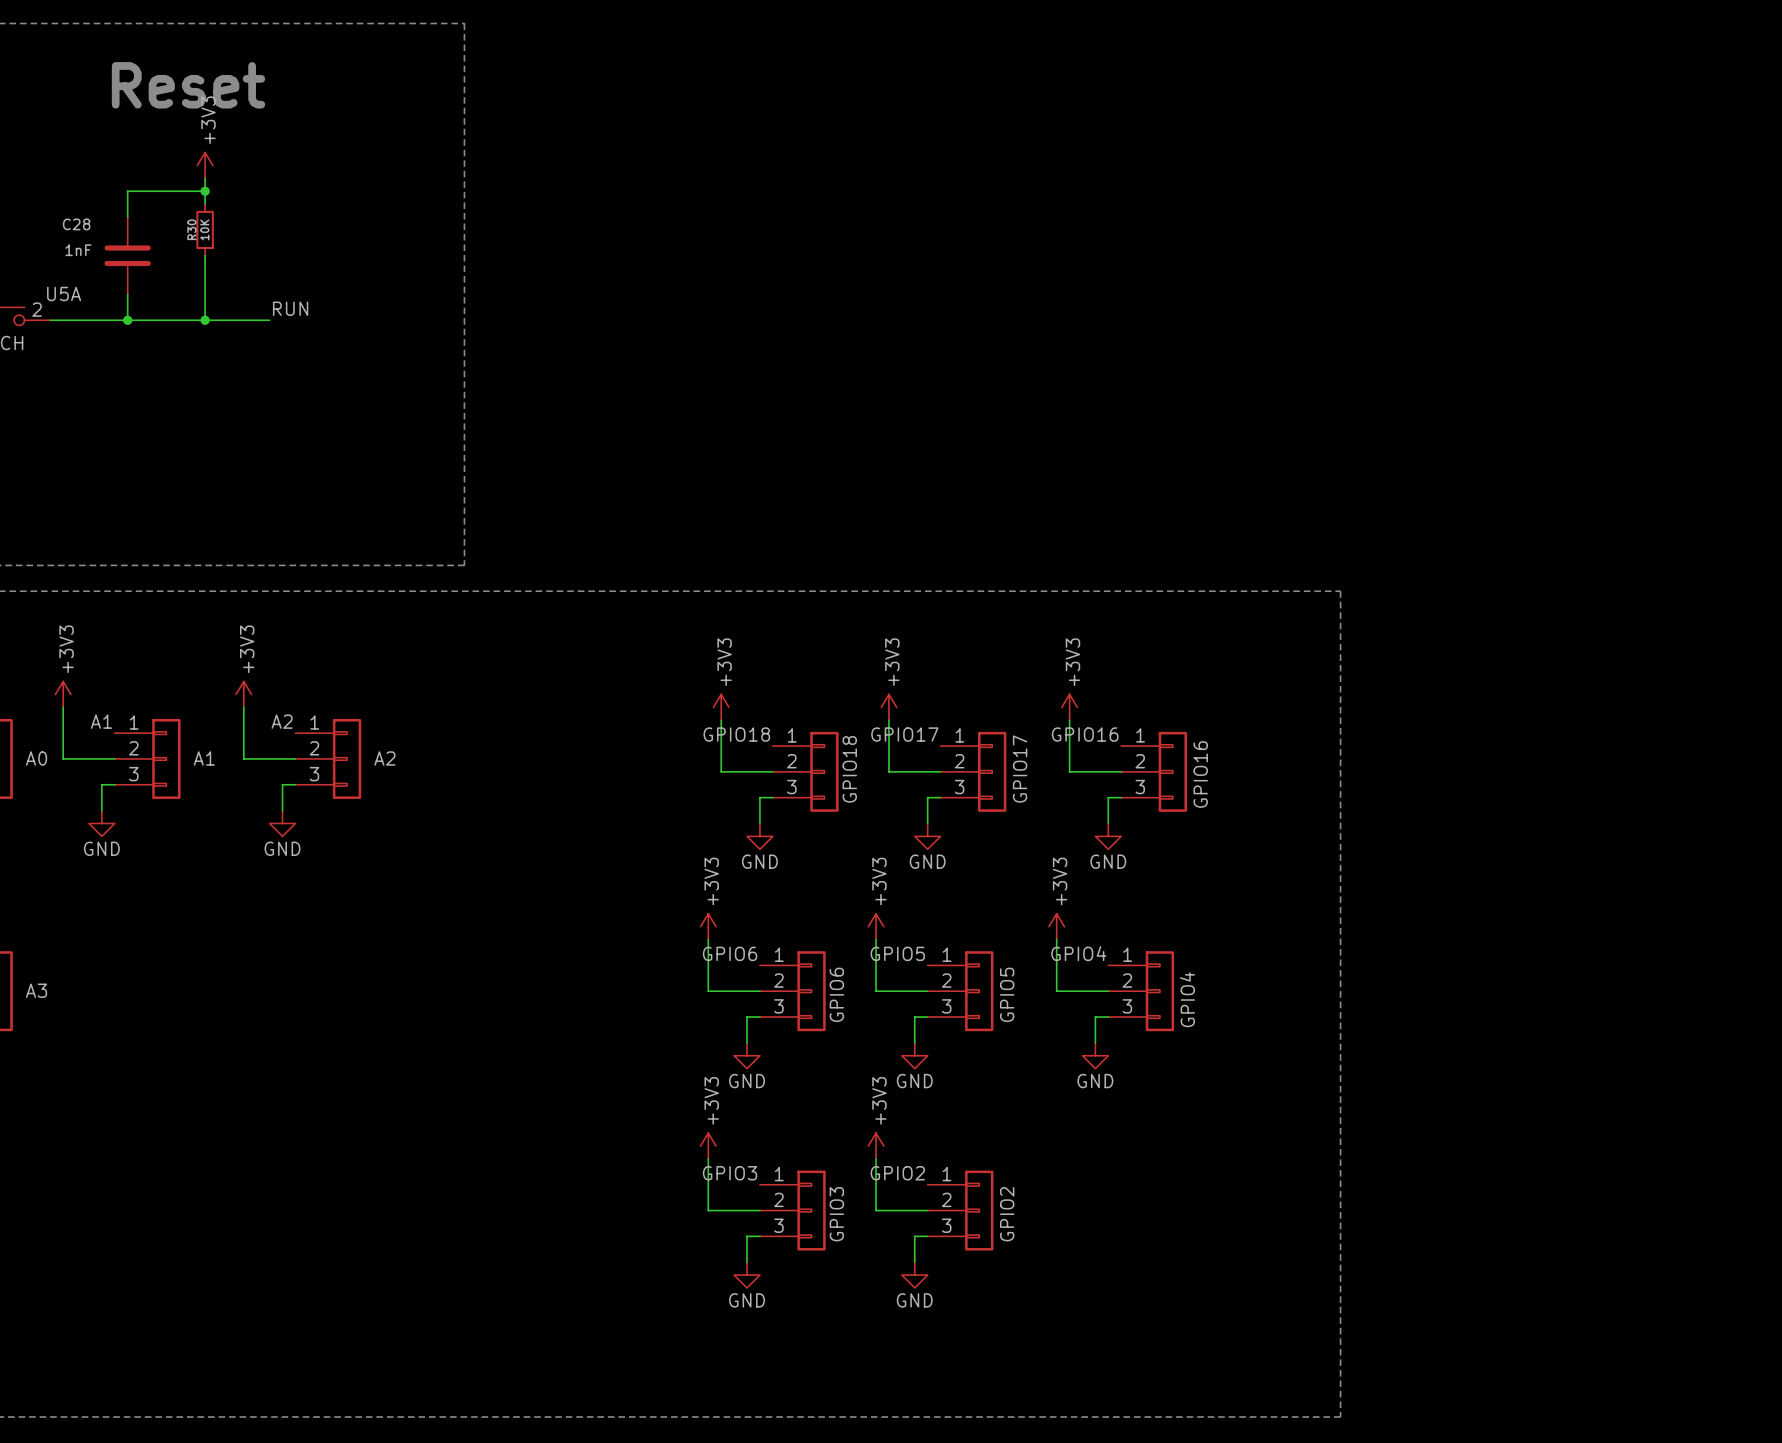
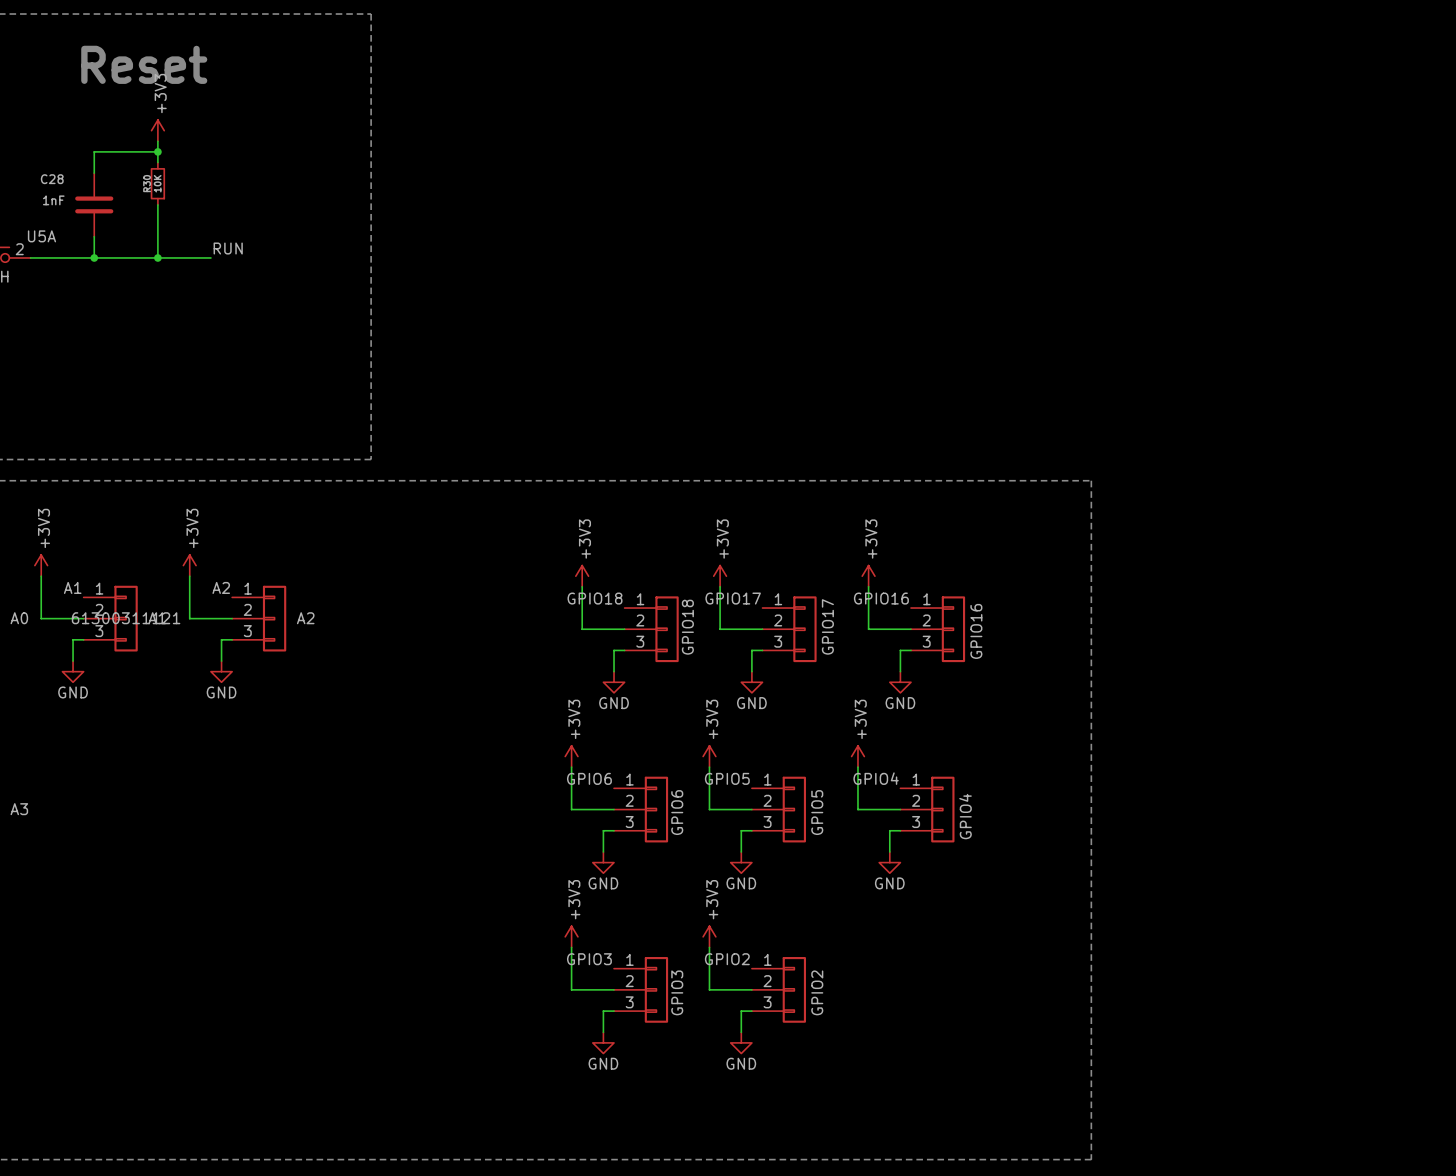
A1 text: none -> 61300311121 (126, 618)

